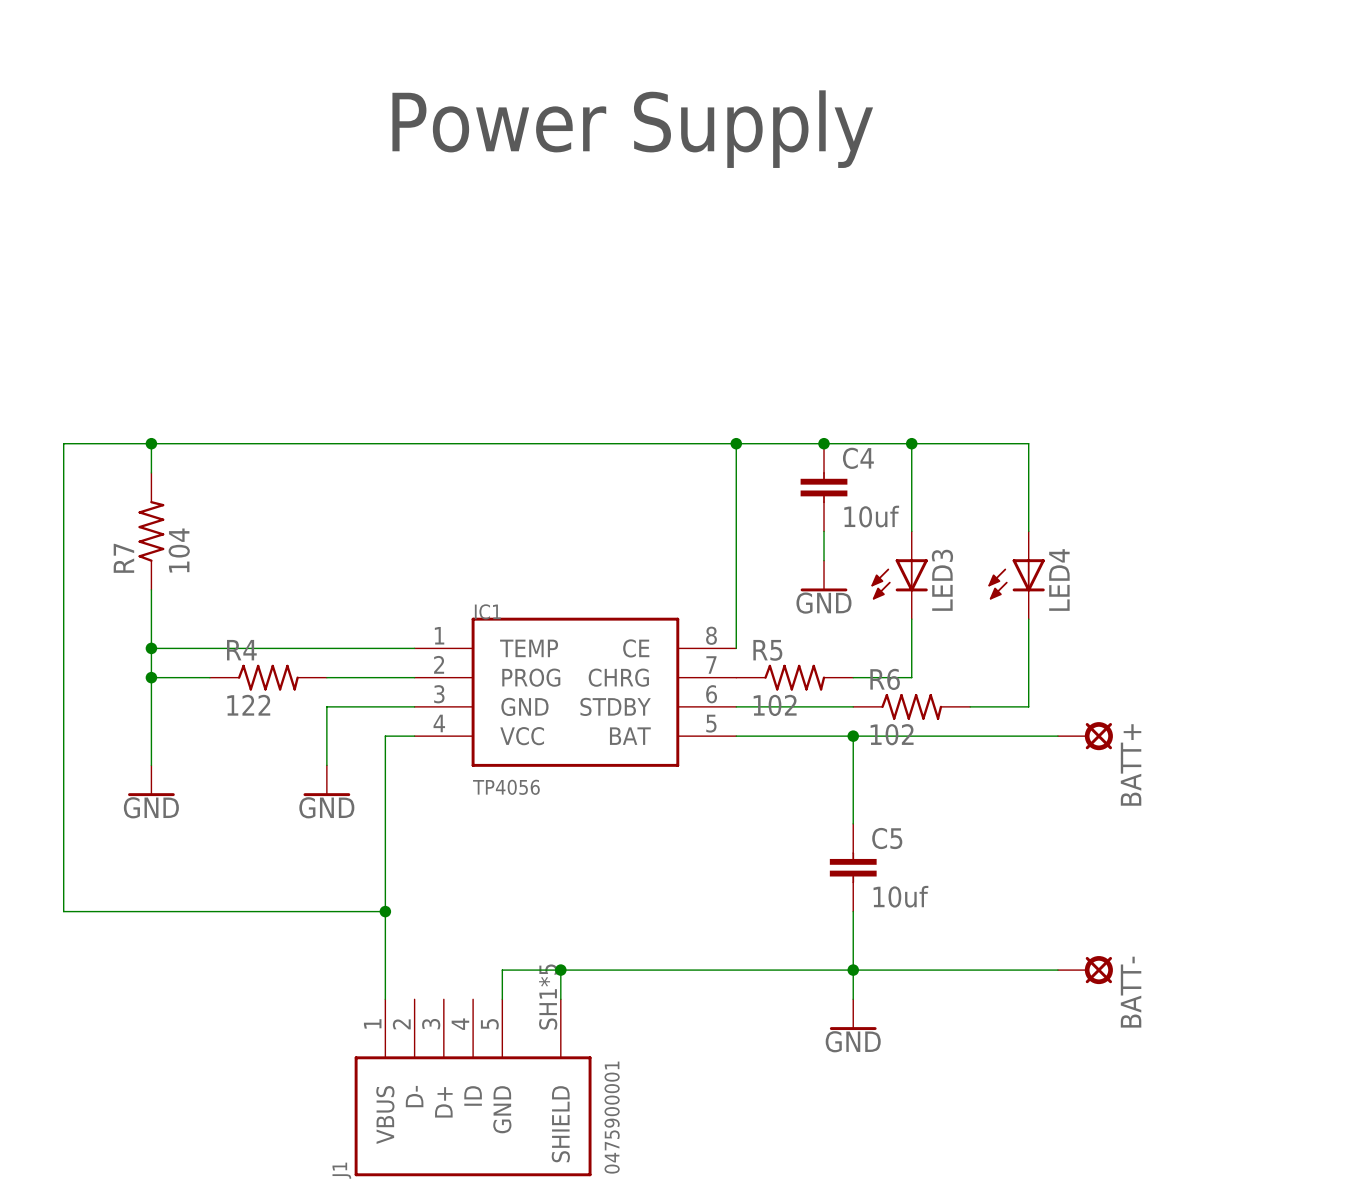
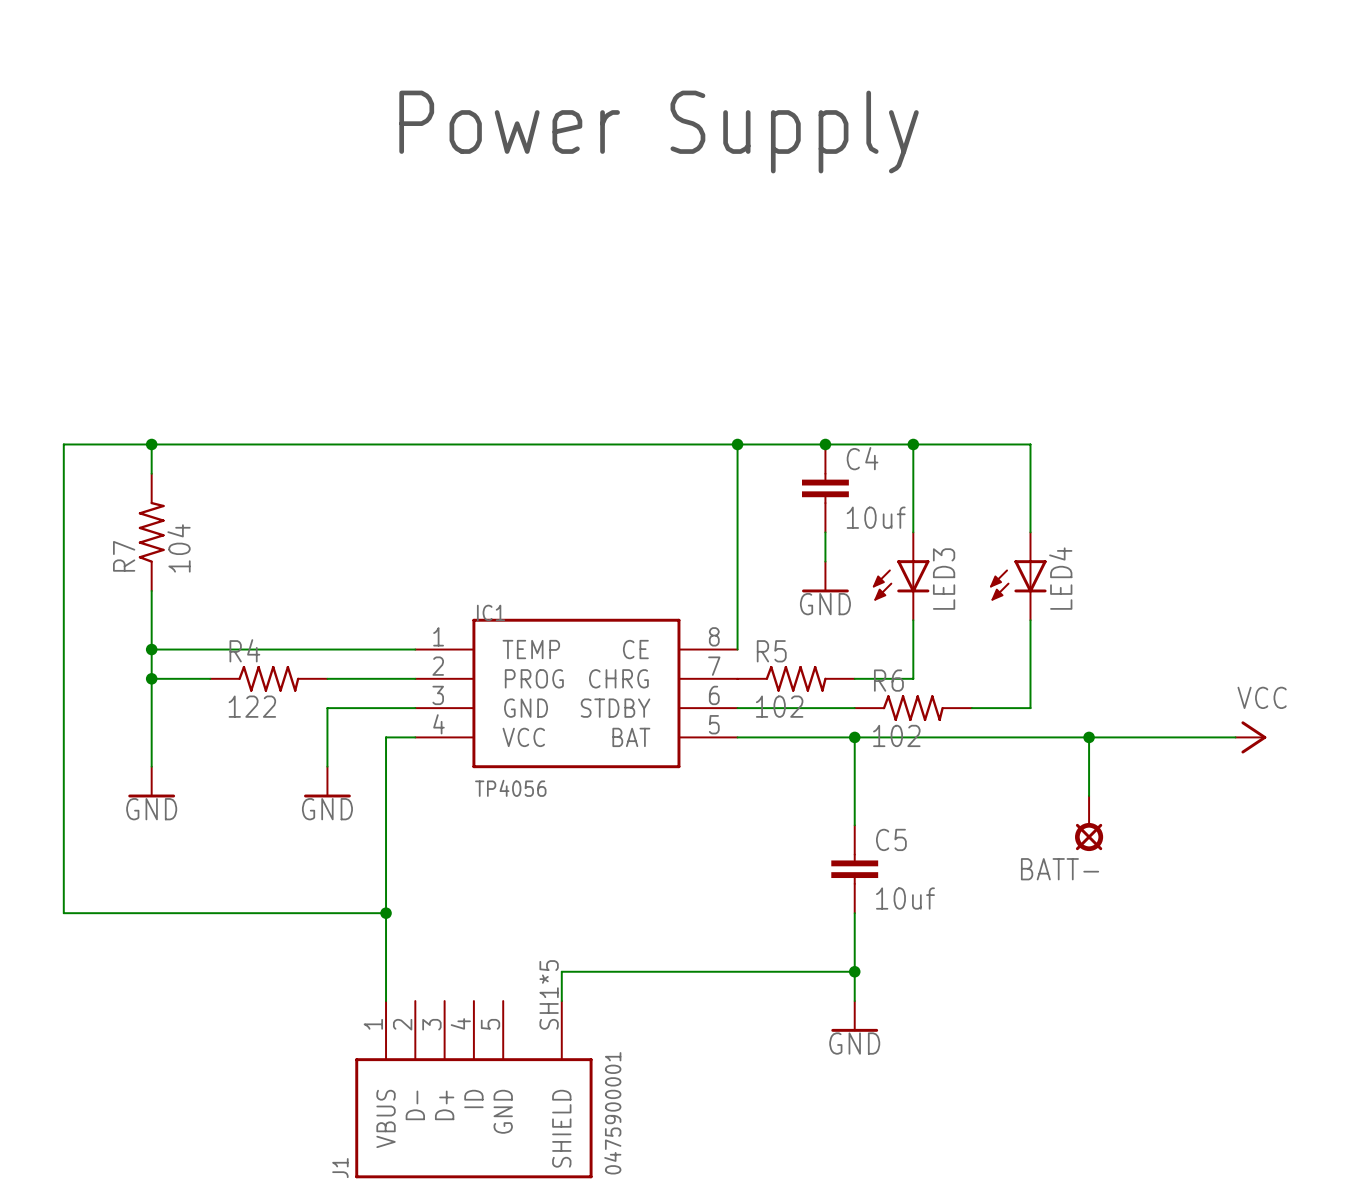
wire: none -> (1059, 737) (1235, 737)
BATT+: (1085, 736) -> none
wire: none -> (1089, 737) (1089, 796)
junction: none -> (1089, 737)
power symbol: none -> VCC (1250, 737)
wire: (560, 970) (502, 970) (502, 999) -> none
junction: (560, 970) -> none
wire: (853, 970) (1057, 970) -> none
BATT- position: (1085, 970) -> (1089, 823)
BATT- rotation: 0° (1098, 970) -> 90° clockwise (1089, 837)

